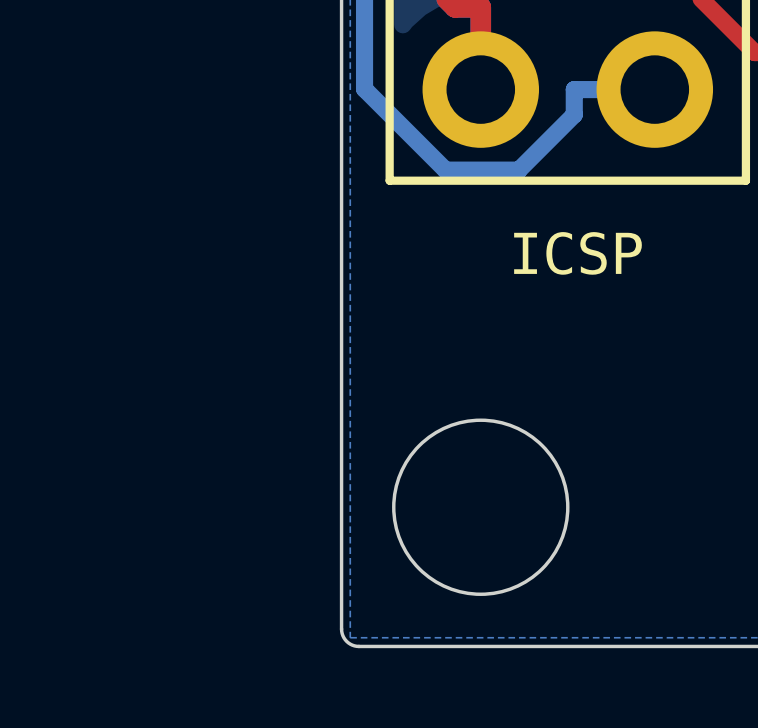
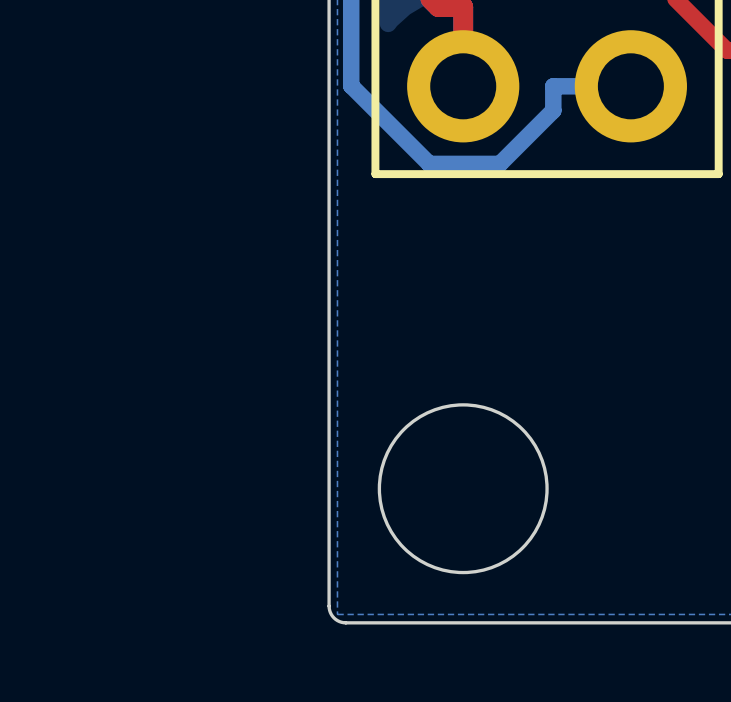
part value: ICSP (577, 253) -> none

